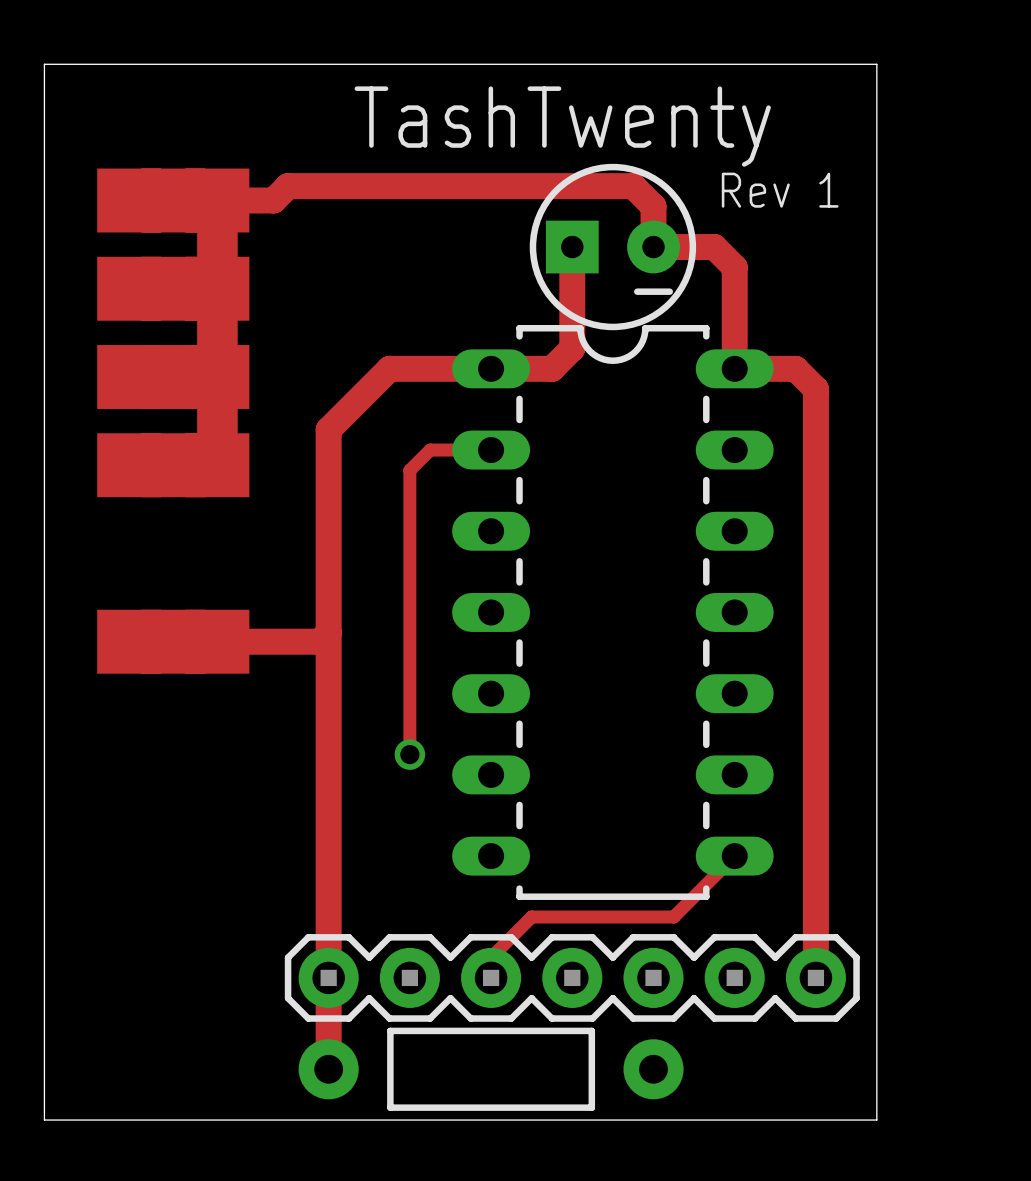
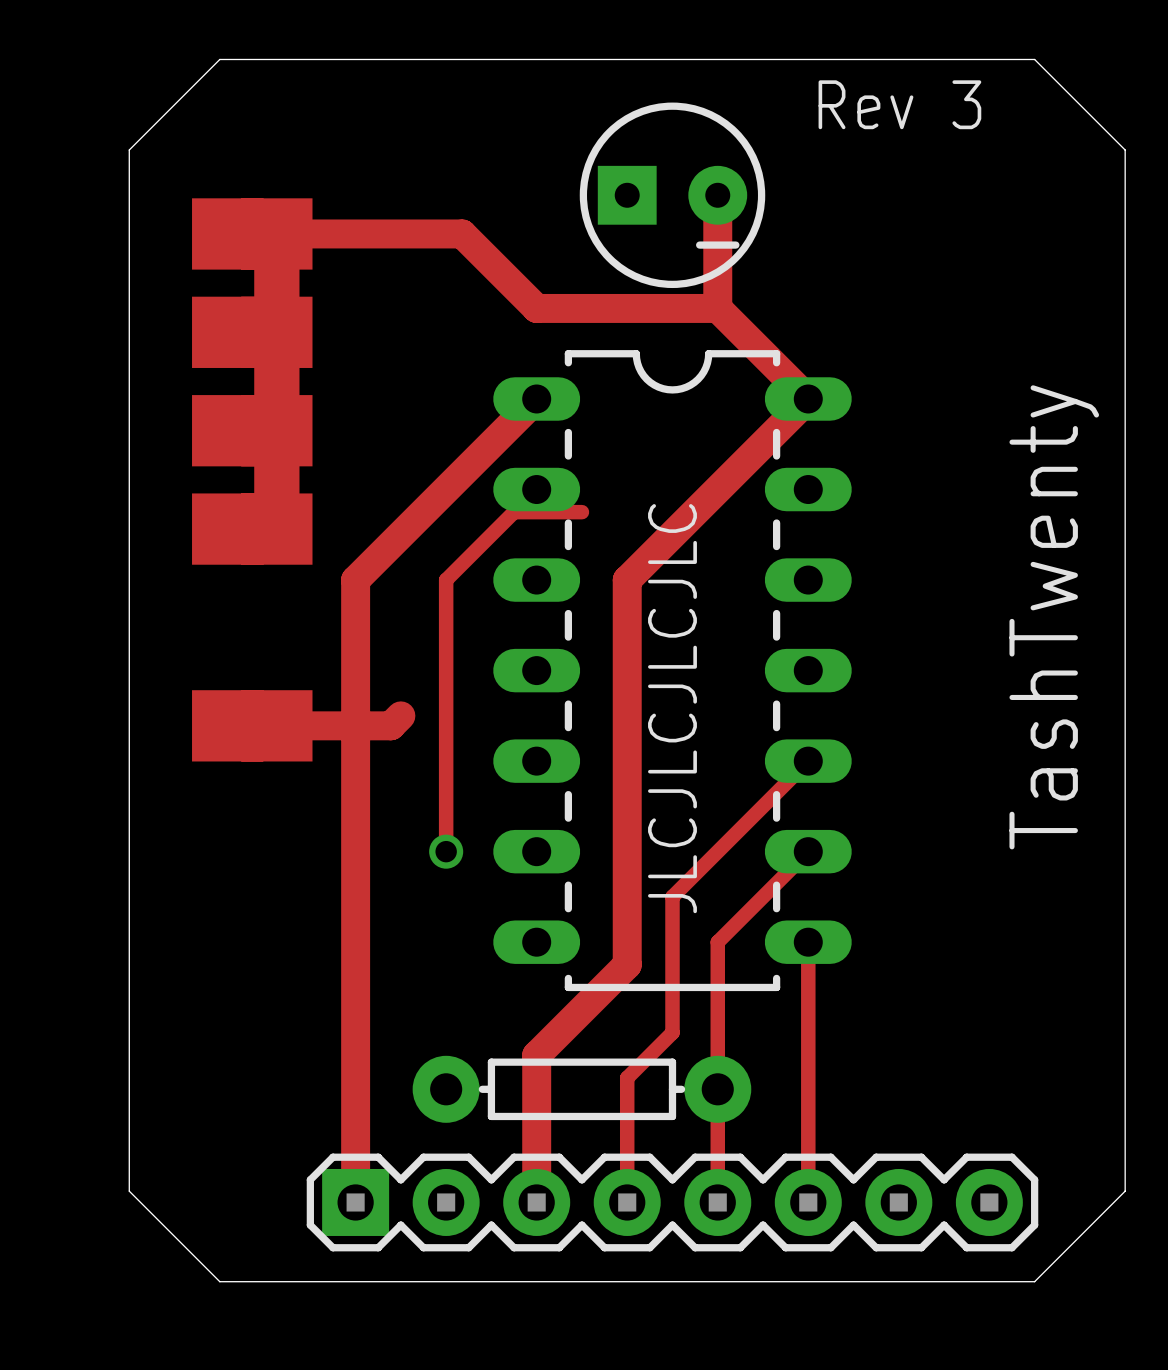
board edge: (44, 64) (876, 64) (876, 1120) (44, 1120) (44, 64) -> (219, 59) (129, 150) (129, 1191) (219, 1281) (1034, 1281) (1125, 1191) (1125, 150) (1034, 59) (219, 59)
text: none -> Rev 3 (899, 104)
text rotation: 0° (562, 126) -> 90° counterclockwise (1054, 617)
text position: TashTwenty (562, 126) -> TashTwenty (1054, 617)
track: none -> (717, 195) (717, 308)
text: Rev 1 (780, 190) -> none
part: (129, 200) -> none
track: (273, 200) (288, 186) (633, 186) (653, 206) (653, 247) (714, 247) (734, 267) (734, 368) (795, 368) (815, 389) (815, 977) -> (339, 233) (462, 233) (536, 308) (717, 308)
track: (572, 247) (572, 348) (552, 368) (389, 368) (328, 429) (328, 1069) -> none
part position: (612, 247) -> (672, 195)
track: none -> (717, 308) (808, 398) (627, 580) (627, 964) (536, 1055) (536, 1202)
part: (129, 288) -> none
track: none -> (536, 398) (355, 580) (355, 1202)
part: (129, 376) -> none
part: (129, 465) -> none
track: (409, 470) (409, 754) -> (491, 534) (446, 580) (446, 851)
part position: (612, 612) -> (672, 670)
text: none -> JLCJLCJLCJLC (672, 708)
part: (129, 641) -> none
track: none -> (808, 761) (672, 896) (672, 1032) (627, 1077) (627, 1202)
via position: (409, 754) -> (446, 851)
track: none -> (808, 851) (717, 942) (717, 1202)
track: none -> (808, 942) (808, 1202)
track: (734, 856) (673, 917) (531, 917) (491, 957) (491, 977) -> none
part: none -> (581, 1089)
part: (572, 977) -> none
part: (491, 1069) -> none
part: none -> (672, 1202)

